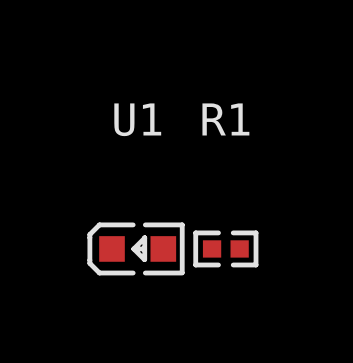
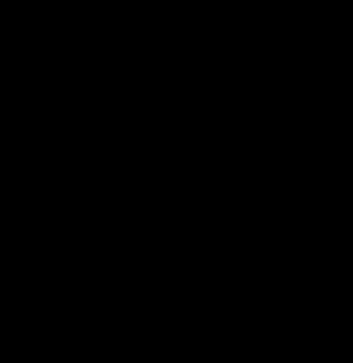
U1: (136, 248) -> none
R1: (225, 248) -> none

